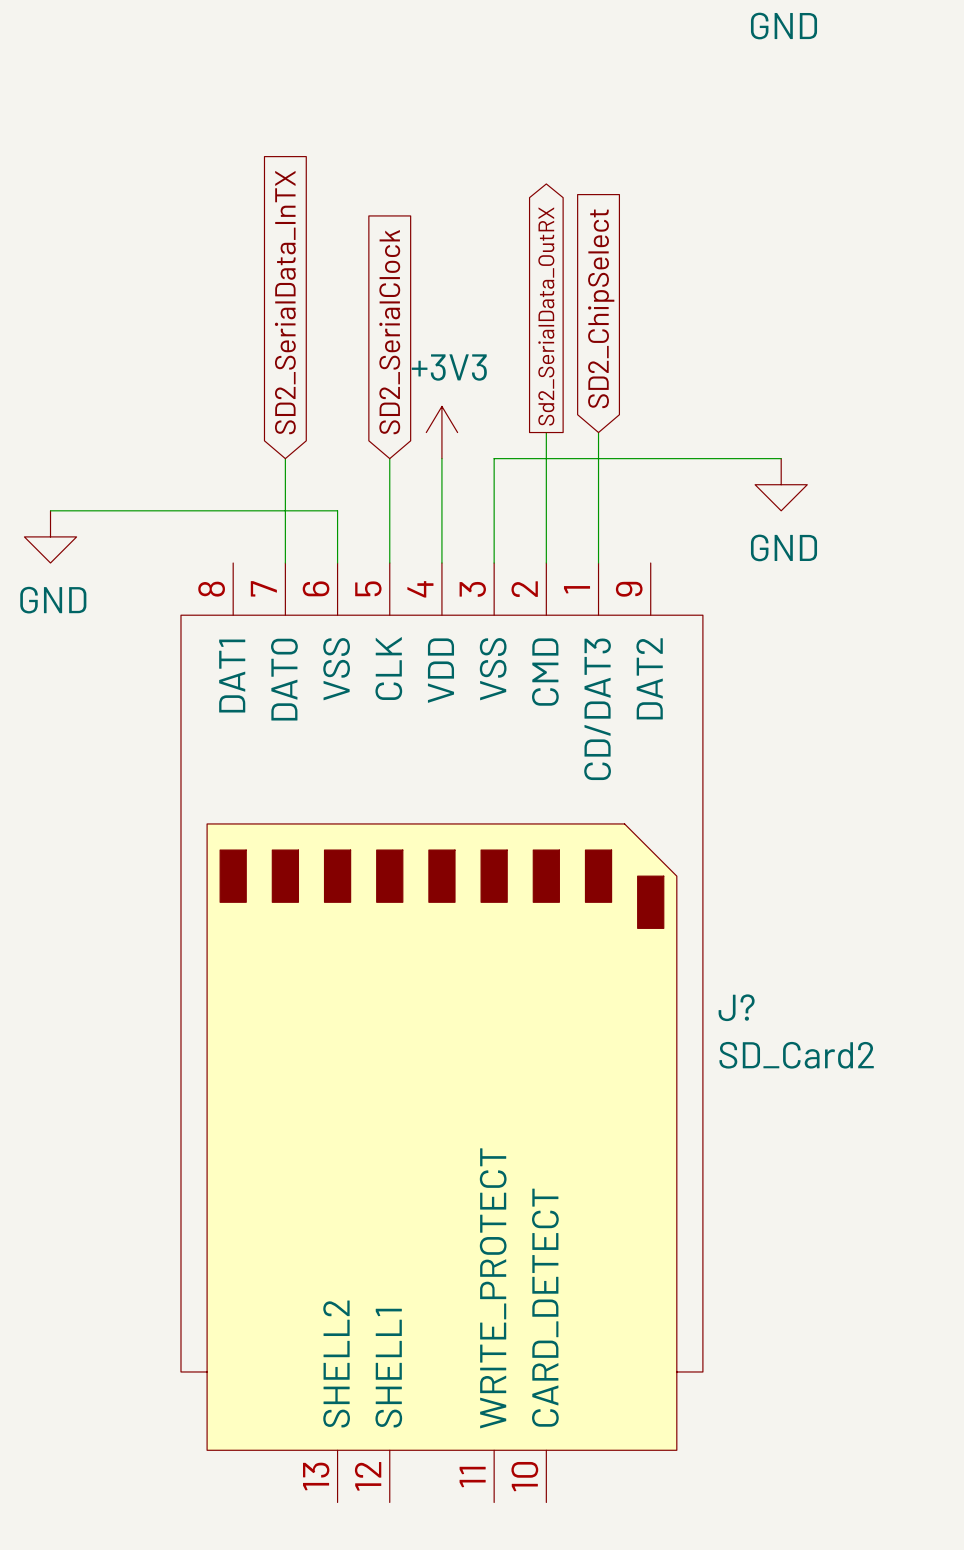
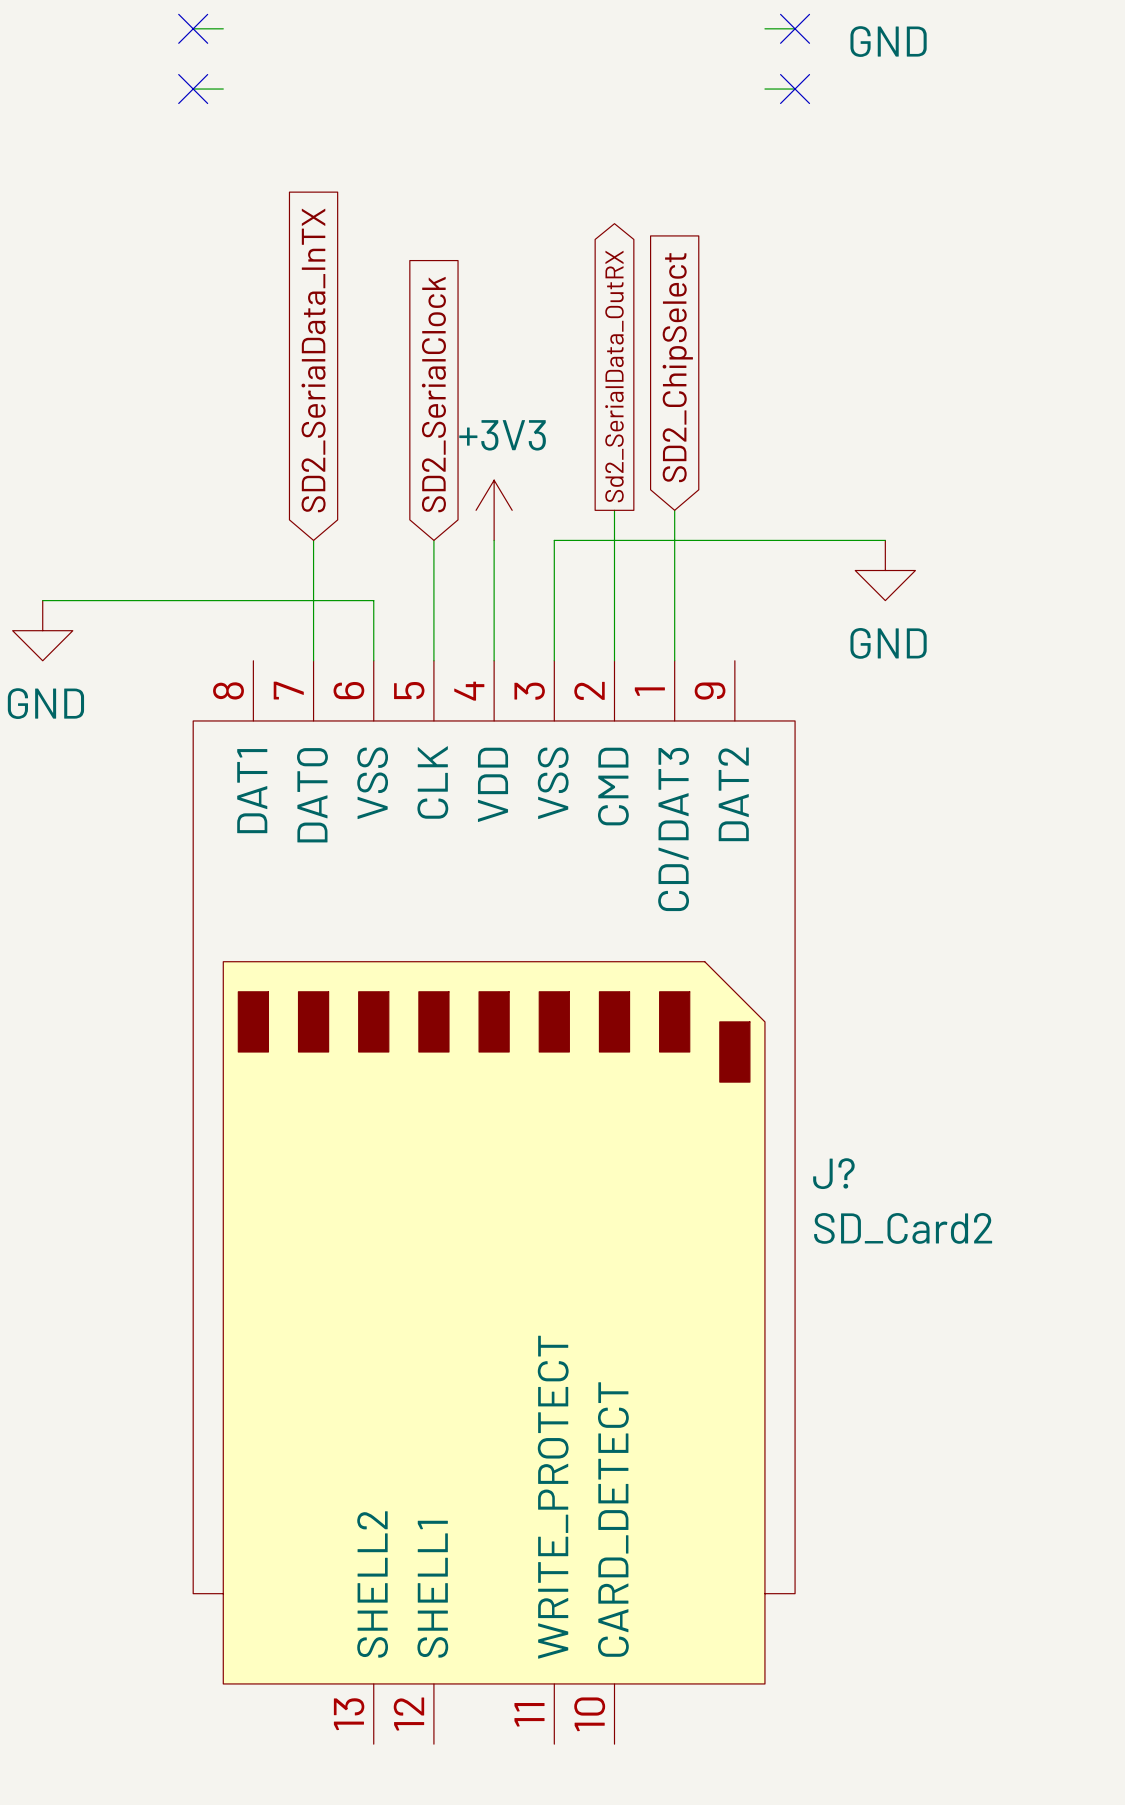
wire: none -> (193, 28) (223, 28)
no-connect mark: none -> (193, 28)
wire: none -> (764, 28) (795, 28)
no-connect mark: none -> (795, 28)
wire: none -> (193, 89) (223, 89)
no-connect mark: none -> (193, 89)
wire: none -> (764, 89) (795, 89)
no-connect mark: none -> (795, 89)

